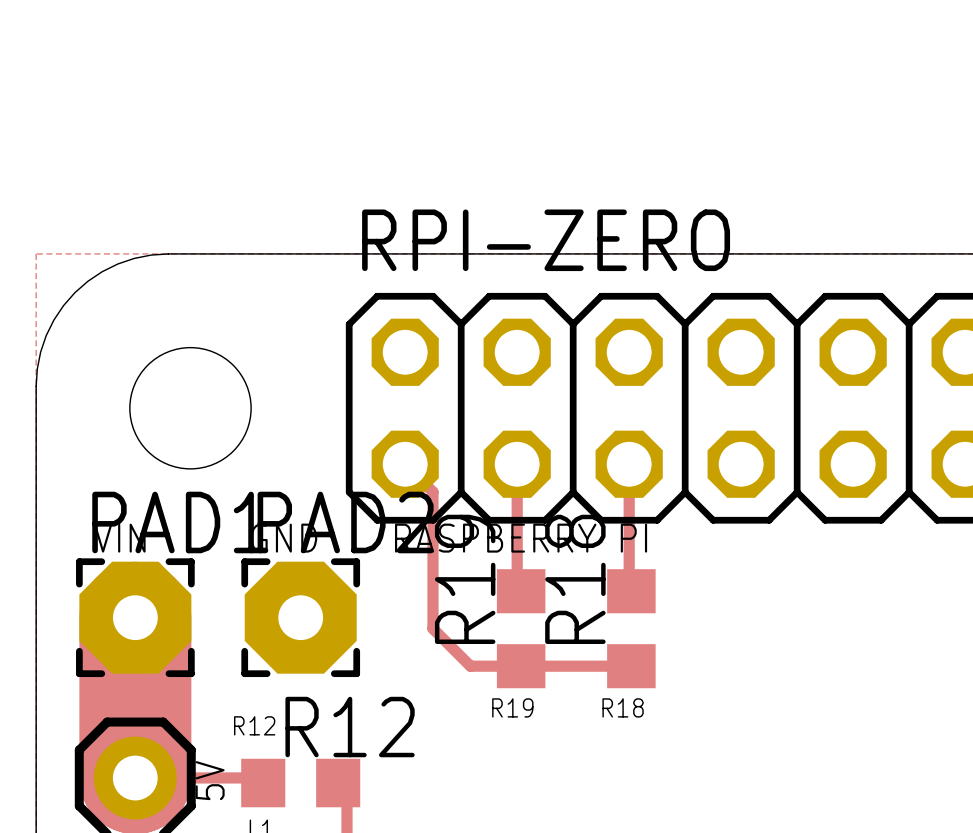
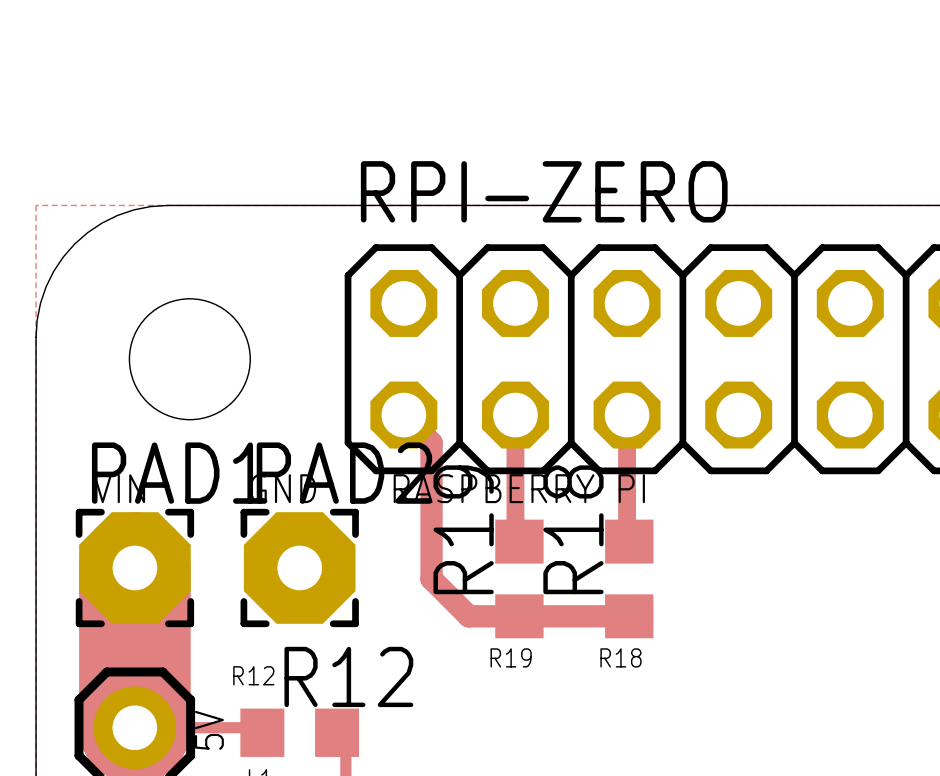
track width: thin (405, 464) (432, 492) (432, 628) (470, 666) (631, 666) -> thick (403, 415) (431, 442) (431, 578) (468, 616) (629, 616)
track width: thin (517, 464) (517, 587) -> thick (515, 415) (515, 537)
track width: thin (629, 464) (629, 589) -> thick (627, 415) (627, 539)

